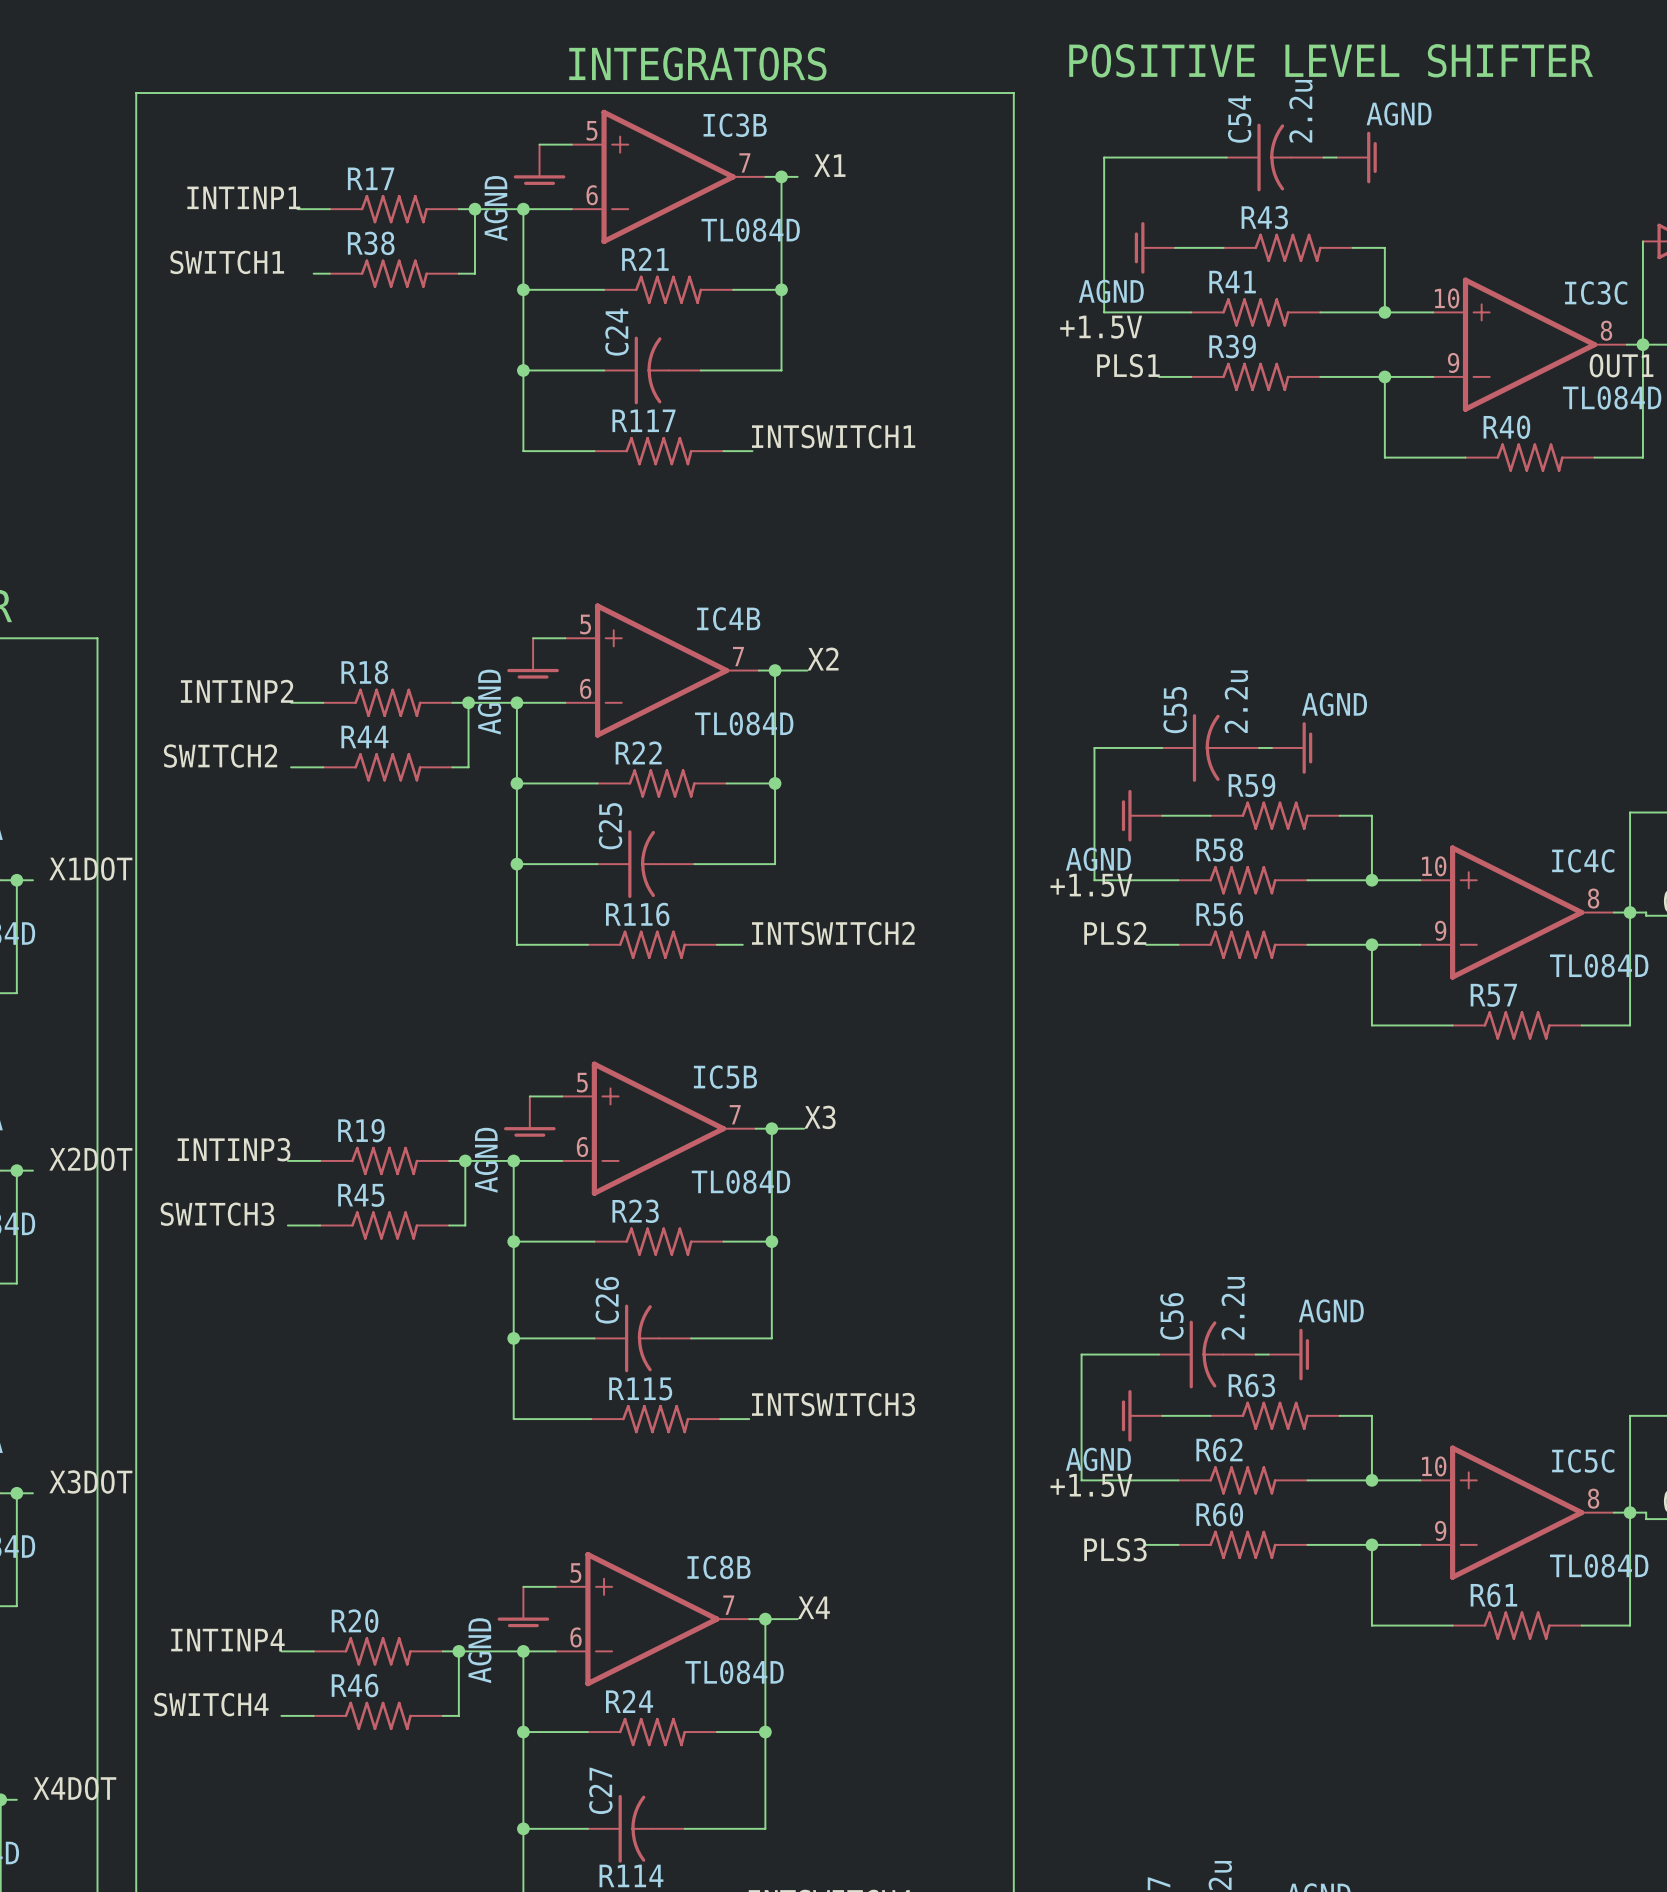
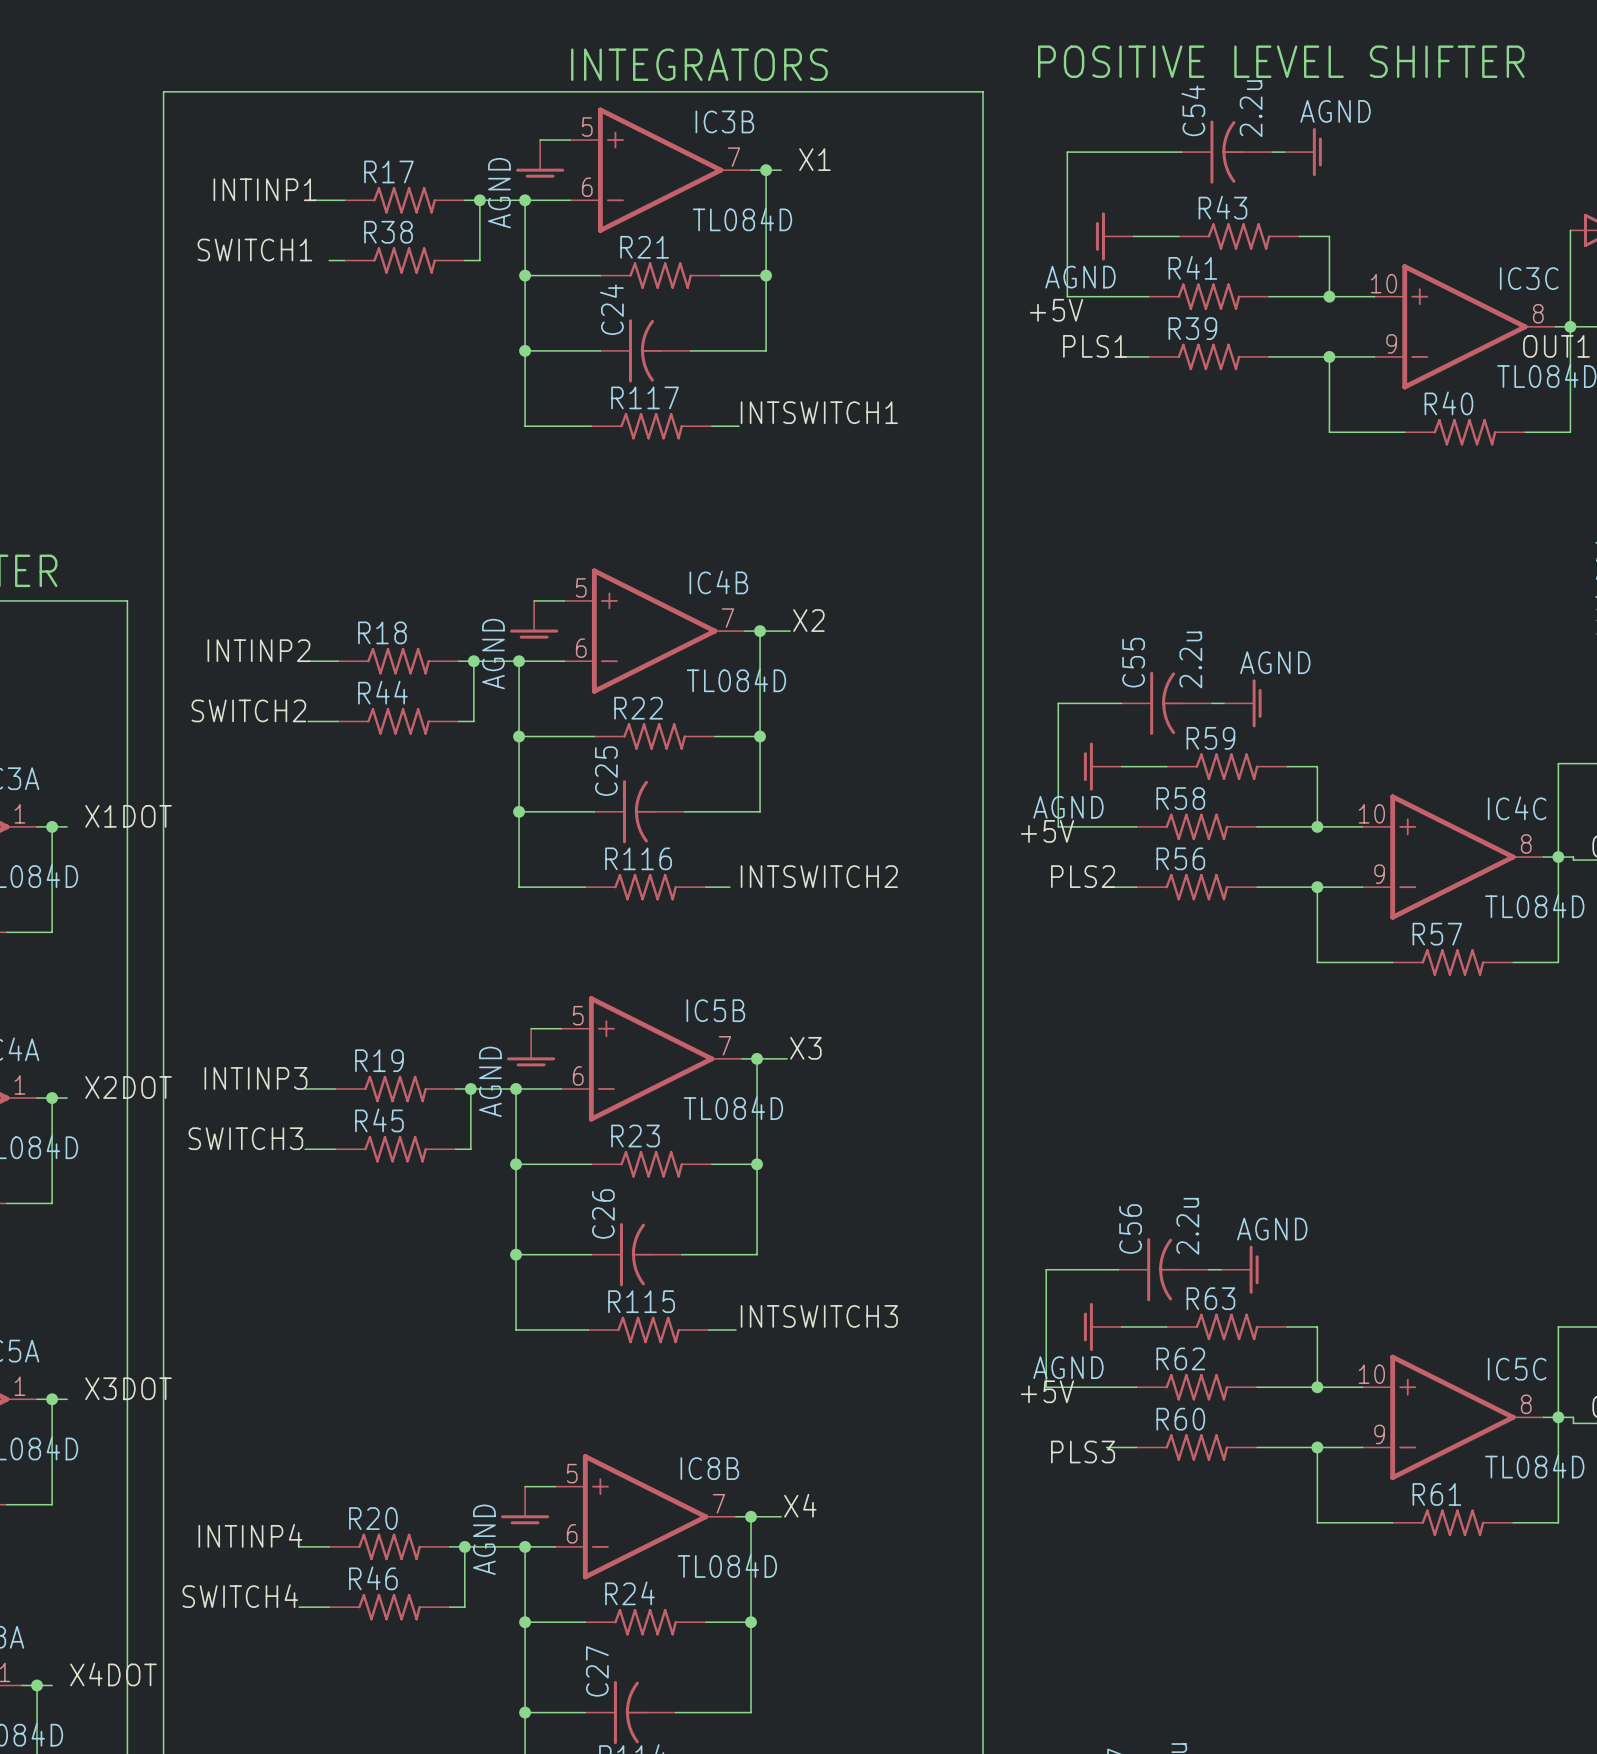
label: +1.5V (1101, 327) -> +5V (1056, 310)
label: +1.5V (1091, 885) -> +5V (1047, 831)
label: +1.5V (1091, 1485) -> +5V (1047, 1391)

